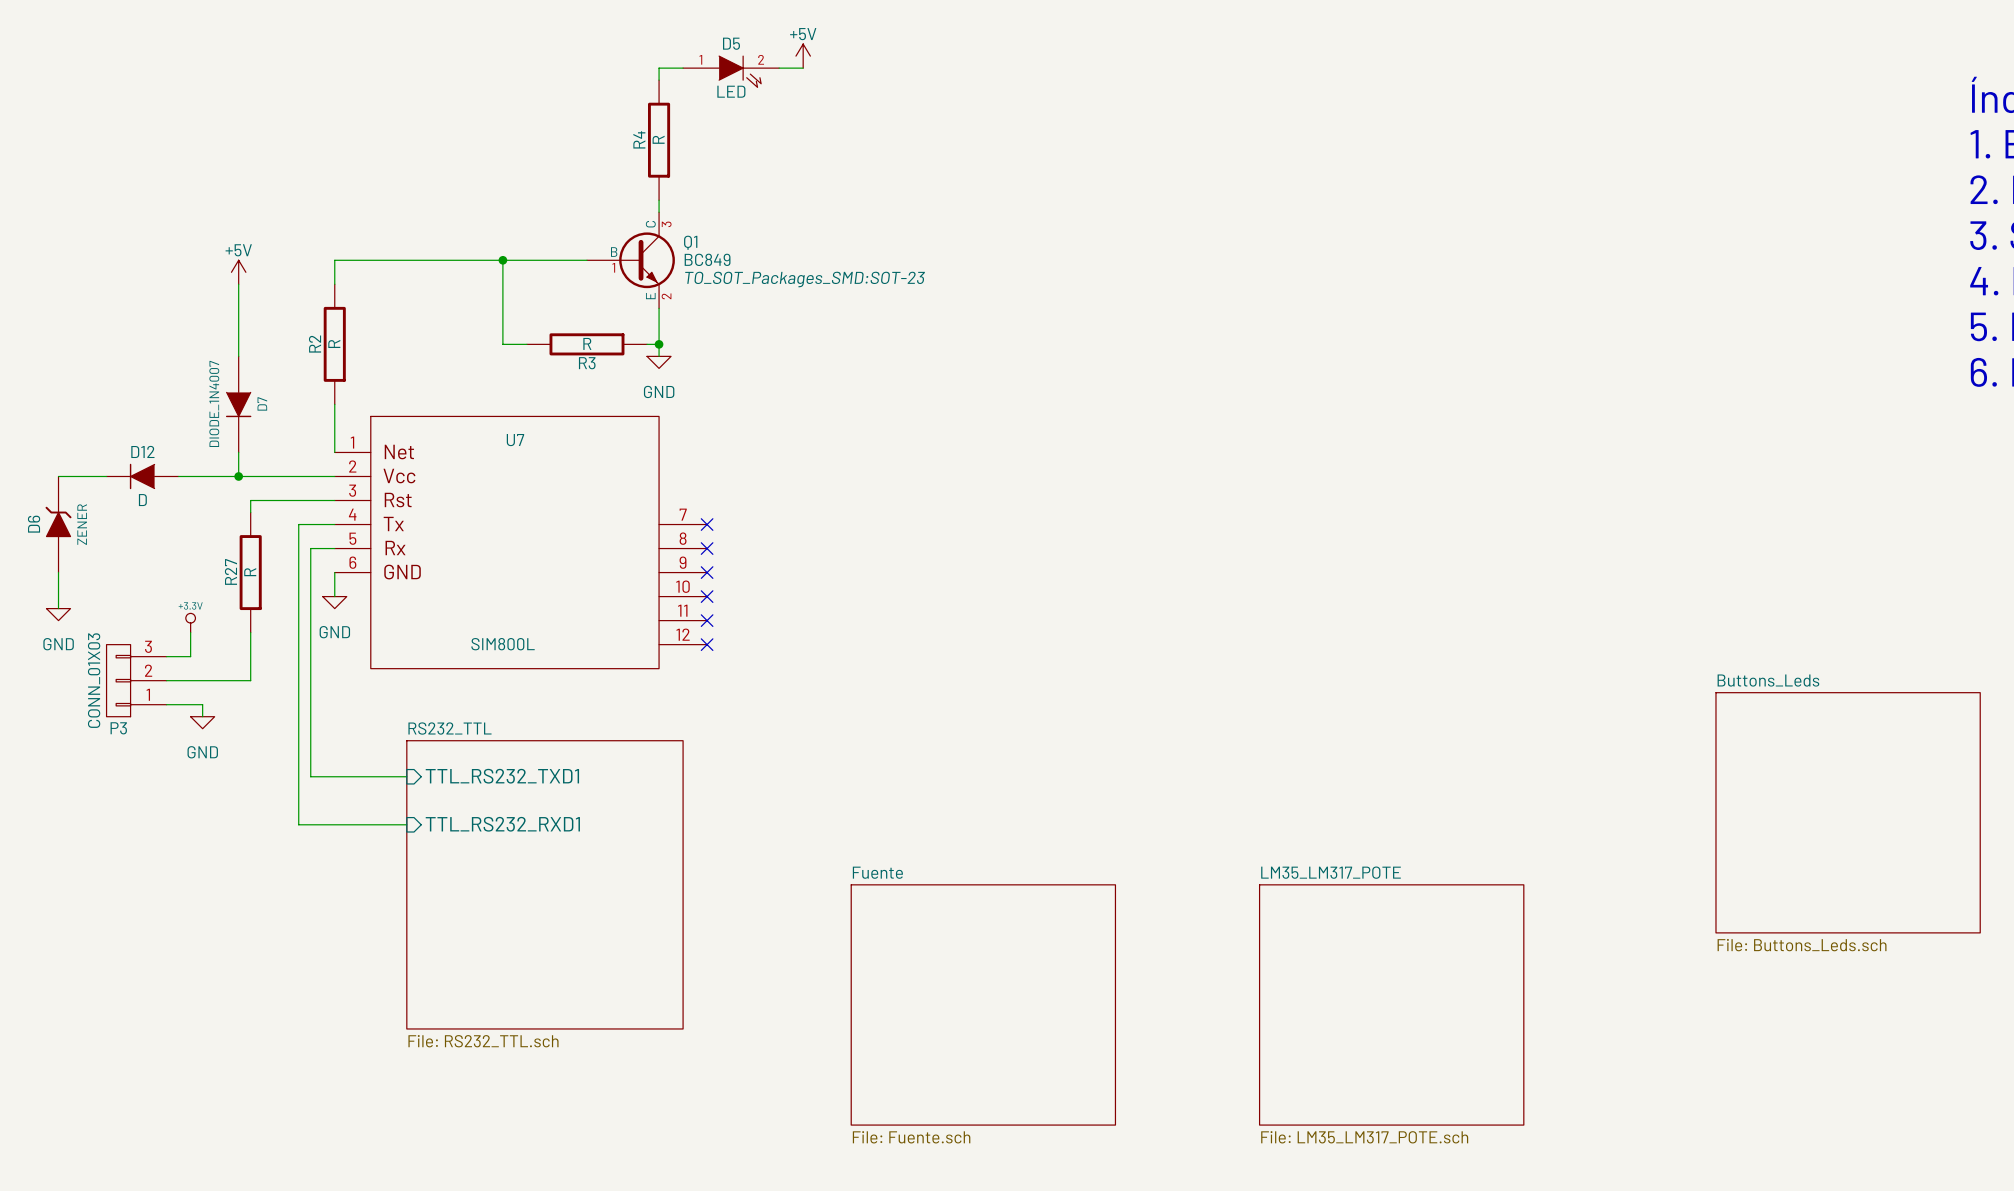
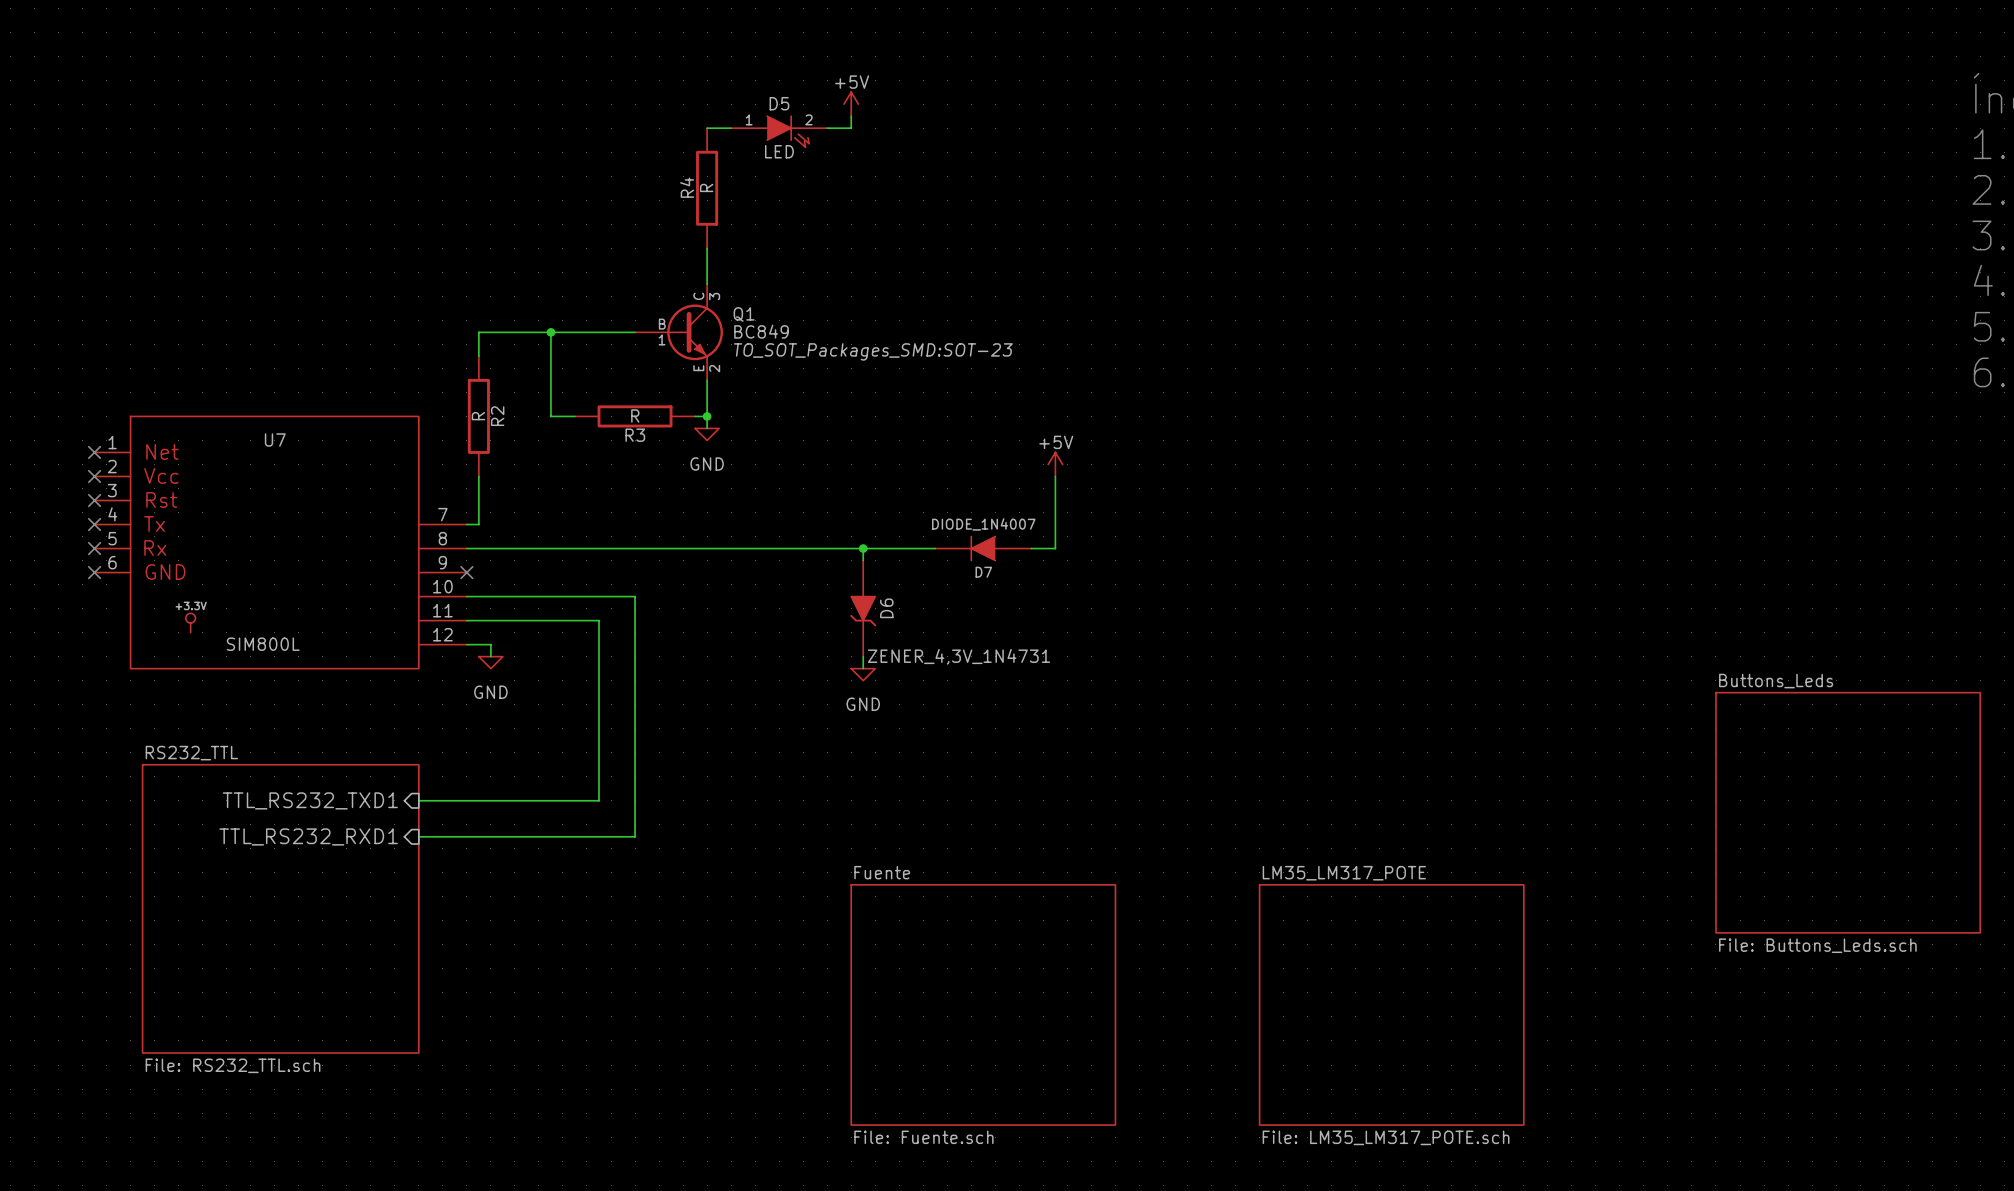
power symbol position: +5V (803, 56) -> +5V (851, 104)
wire: (683, 68) (659, 68) (659, 80) -> none
wire: (779, 68) (803, 68) -> (707, 128) (731, 128)
D5 position: (731, 71) -> (779, 131)
wire: none -> (851, 116) (851, 128) (827, 128)
R4 position: (659, 140) -> (707, 188)
wire: (659, 200) (659, 212) -> none
wire: none -> (707, 248) (707, 284)
wire: (502, 260) (502, 344) (526, 344) -> (550, 332) (550, 416) (574, 416)
junction: (502, 260) -> none
wire: (586, 260) (334, 260) (334, 284) -> none
Q1 position: (630, 260) -> (678, 332)
power symbol: +5V (238, 272) -> none
wire: (238, 284) (238, 356) -> none
wire: (659, 308) (659, 356) -> (707, 380) (707, 428)
junction: none -> (550, 332)
wire: none -> (635, 332) (478, 332) (478, 356)
R2 name position: R2 (315, 344) -> R2 (497, 416)
R2 position: (334, 344) -> (478, 416)
R3 position: (586, 344) -> (635, 416)
wire: (647, 344) (659, 344) -> (695, 416) (707, 416)
junction: (659, 344) -> none
power symbol position: GND (659, 362) -> GND (707, 434)
D7 rotation: 0° (238, 404) -> 90° clockwise (982, 548)
D7 position: (238, 404) -> (983, 548)
wire: (334, 404) (334, 452) -> none
junction: none -> (707, 416)
no-connect mark: none -> (94, 452)
wire: (238, 452) (238, 476) -> none
power symbol: none -> +5V (1055, 464)
wire: (58, 476) (106, 476) -> none
no-connect mark: none -> (94, 476)
D12: D (142, 476) -> none
wire: (178, 476) (334, 476) -> none
junction: (238, 476) -> none
wire: none -> (478, 476) (478, 524) (466, 524)
wire: none -> (1055, 476) (1055, 548) (1031, 548)
no-connect mark: none -> (94, 500)
wire: (334, 500) (250, 500) (250, 512) -> none
D6 rotation: 0° (58, 521) -> 180° (863, 611)
D6 position: (58, 524) -> (863, 608)
D6 value: ZENER (82, 524) -> ZENER_4,3V_1N4731 (959, 656)
no-connect mark: none -> (94, 524)
wire: (334, 524) (298, 524) (298, 824) (406, 824) -> none
no-connect mark: (707, 524) -> none
U7 position: (520, 542) -> (280, 542)
no-connect mark: none -> (94, 548)
wire: (334, 548) (310, 548) (310, 776) (406, 776) -> none
wire: none -> (466, 548) (935, 548)
no-connect mark: (707, 548) -> none
wire: none -> (863, 548) (863, 560)
junction: none -> (863, 548)
wire: (58, 572) (58, 608) -> none
no-connect mark: none -> (94, 572)
R27: R (250, 572) -> none
wire: (334, 572) (334, 596) -> none
no-connect mark: none -> (466, 572)
no-connect mark: (707, 572) -> none
wire: none -> (466, 596) (635, 596) (635, 836) (418, 836)
no-connect mark: (707, 596) -> none
power symbol: GND (334, 602) -> none
power symbol: GND (58, 614) -> none
wire: none -> (466, 620) (598, 620) (598, 800) (418, 800)
no-connect mark: (707, 620) -> none
wire: (190, 632) (190, 656) (166, 656) -> none
wire: (250, 632) (250, 680) (166, 680) -> none
wire: none -> (466, 644) (490, 644) (490, 656)
no-connect mark: (707, 644) -> none
wire: none -> (863, 656) (863, 668)
power symbol: none -> GND (490, 662)
power symbol: none -> GND (863, 674)
P3: CONN_01X03 (136, 680) -> none
wire: (166, 704) (202, 704) (202, 716) -> none
power symbol: GND (202, 722) -> none
sheet pin rotation: 0° (502, 776) -> 180° (310, 800)
sheet pin position: TTL_RS232_TXD1 (502, 776) -> TTL_RS232_TXD1 (310, 800)
sheet pin rotation: 0° (502, 824) -> 180° (308, 836)
sheet pin position: TTL_RS232_RXD1 (502, 824) -> TTL_RS232_RXD1 (308, 836)
sheet RS232_TTL position: (544, 884) -> (280, 908)

